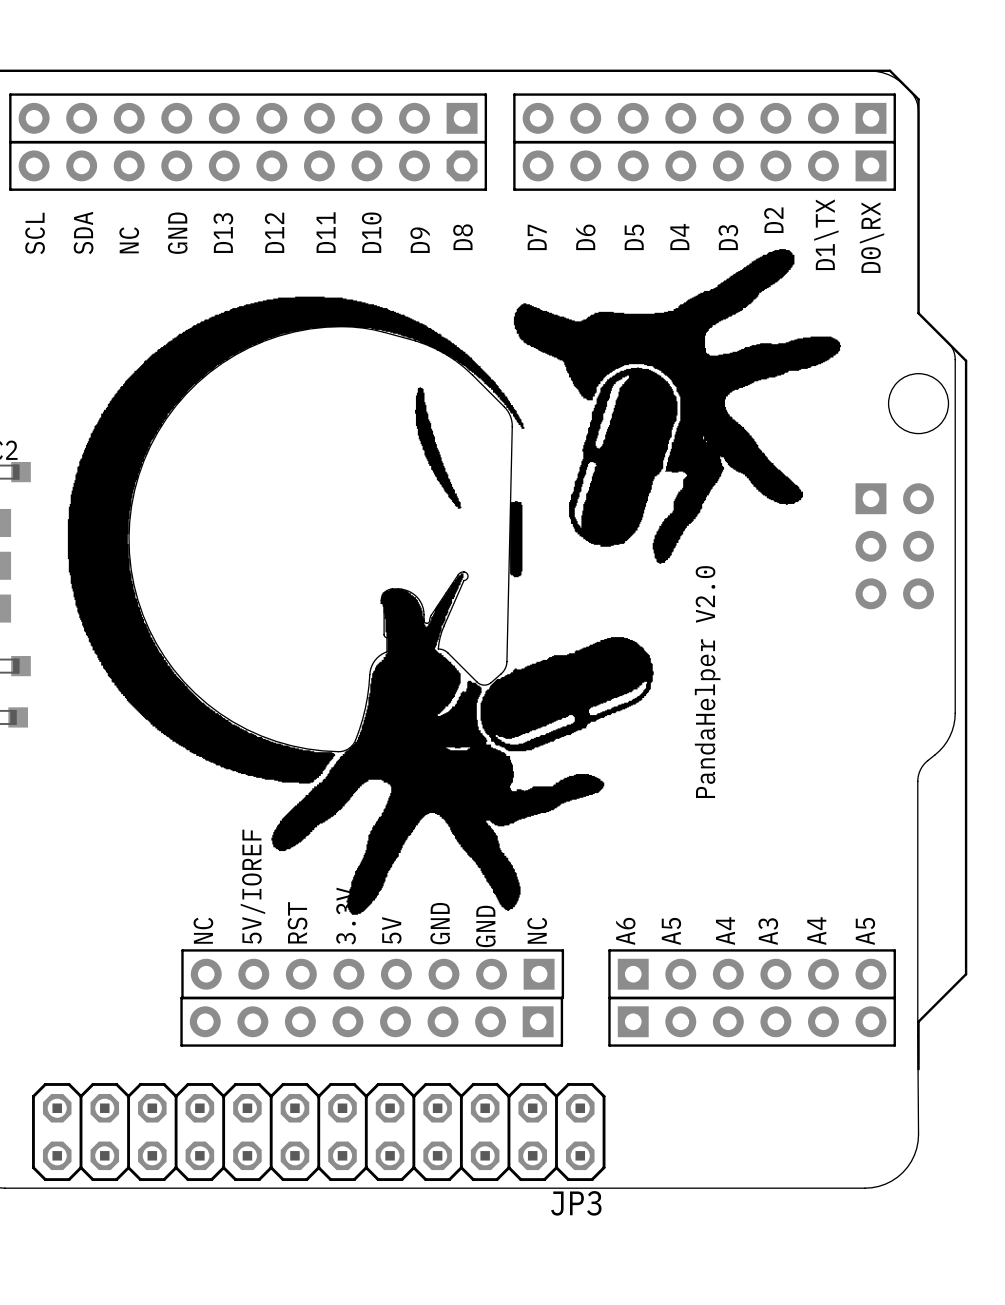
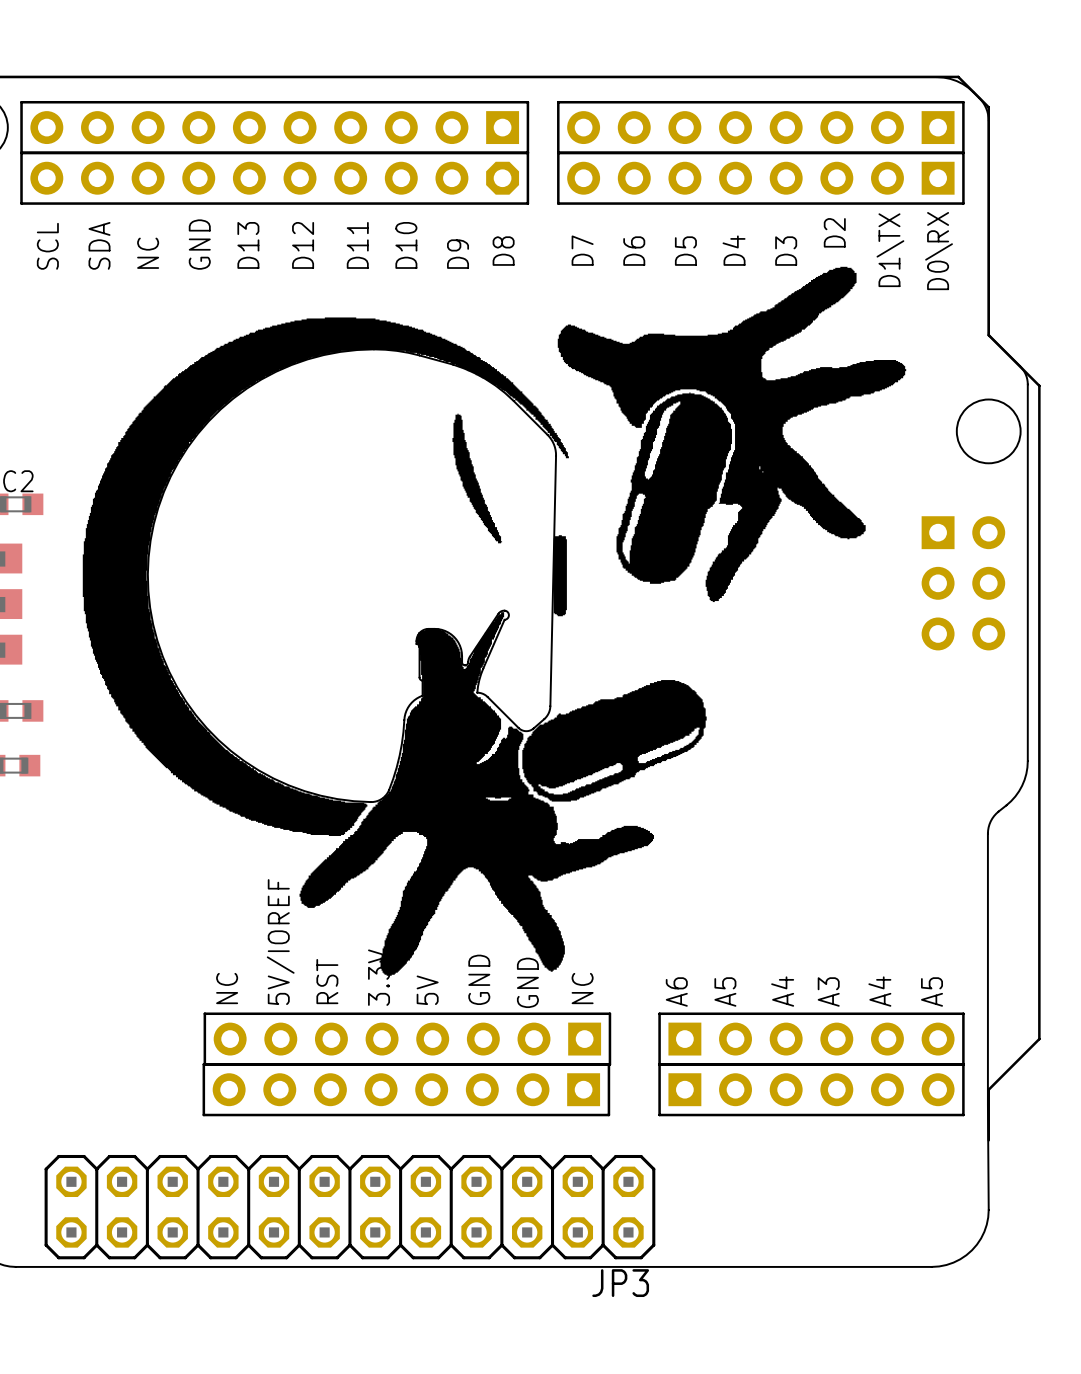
text: PandaHelper V2.0 (707, 682) -> none

